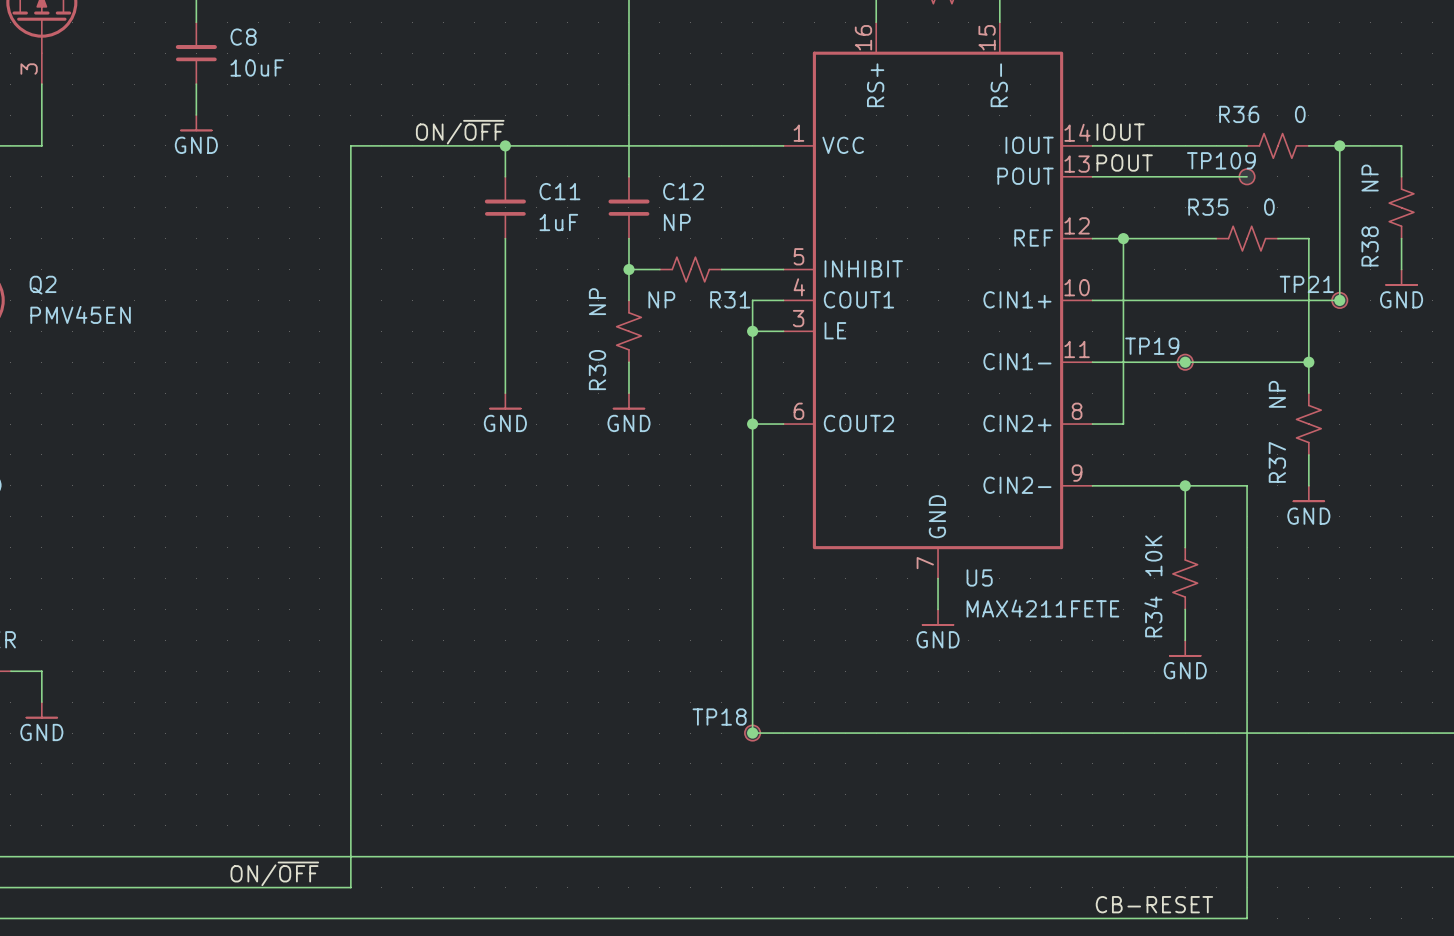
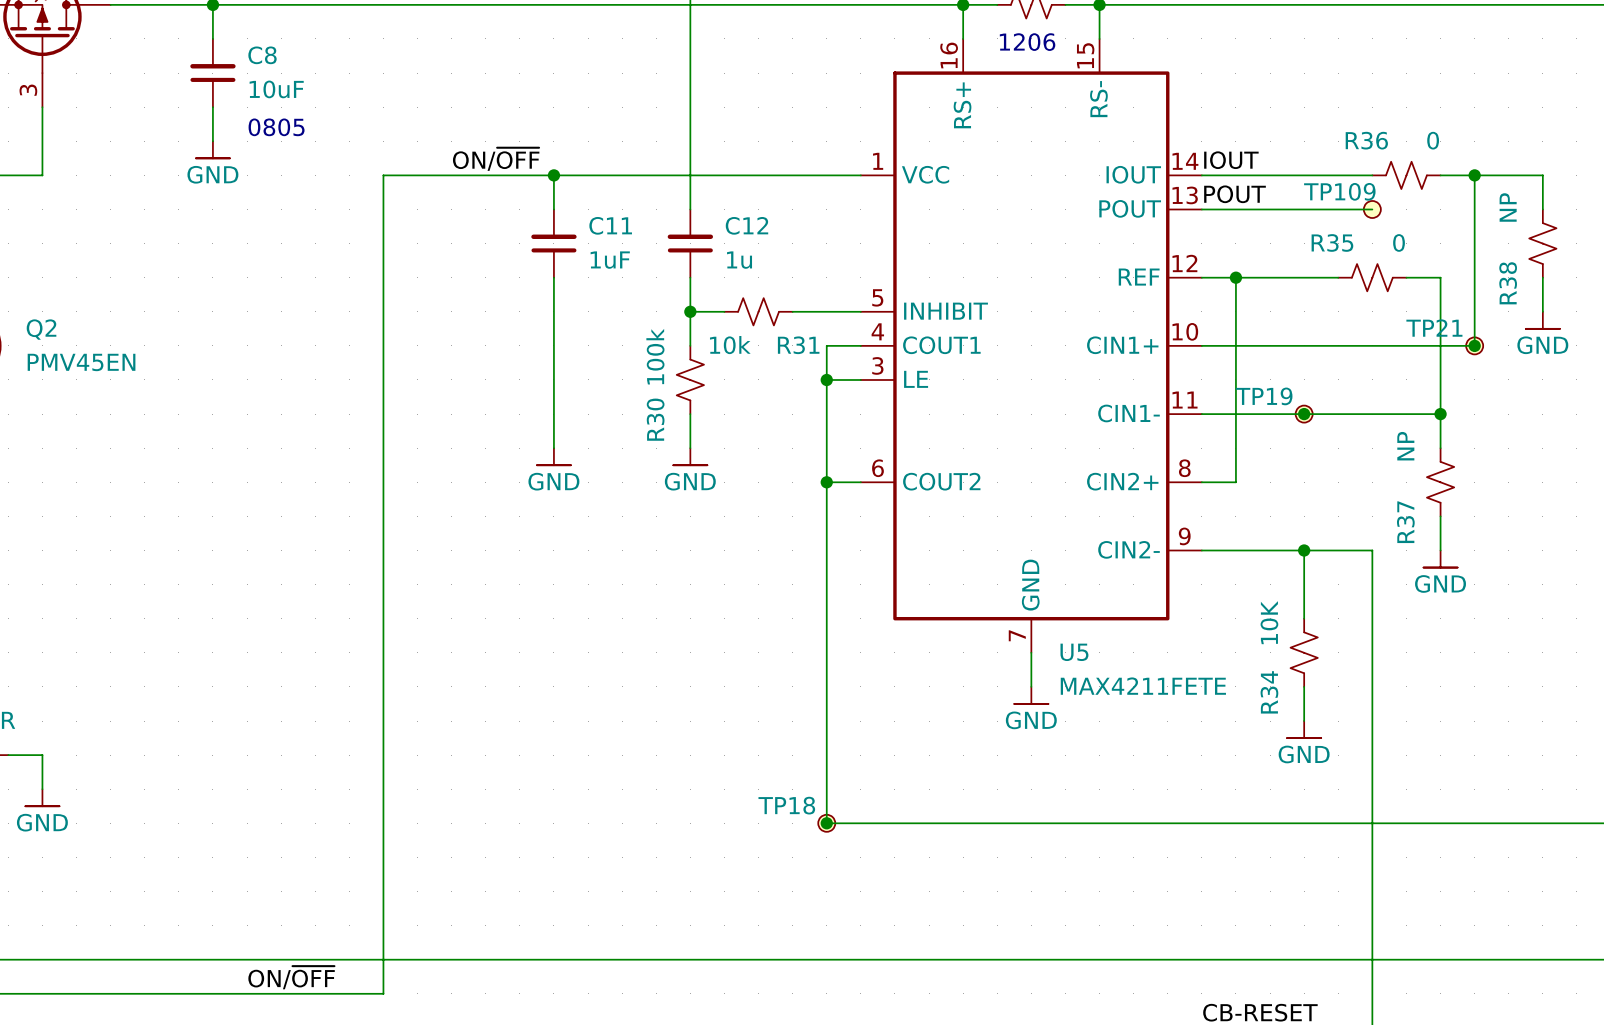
text: none -> 1206 (1027, 42)
text: none -> 0805 (276, 127)
C12 value: NP (677, 222) -> 1u (739, 260)
R31 value: NP (661, 299) -> 10k (730, 345)
R30 value: NP (597, 301) -> 100k (655, 356)

